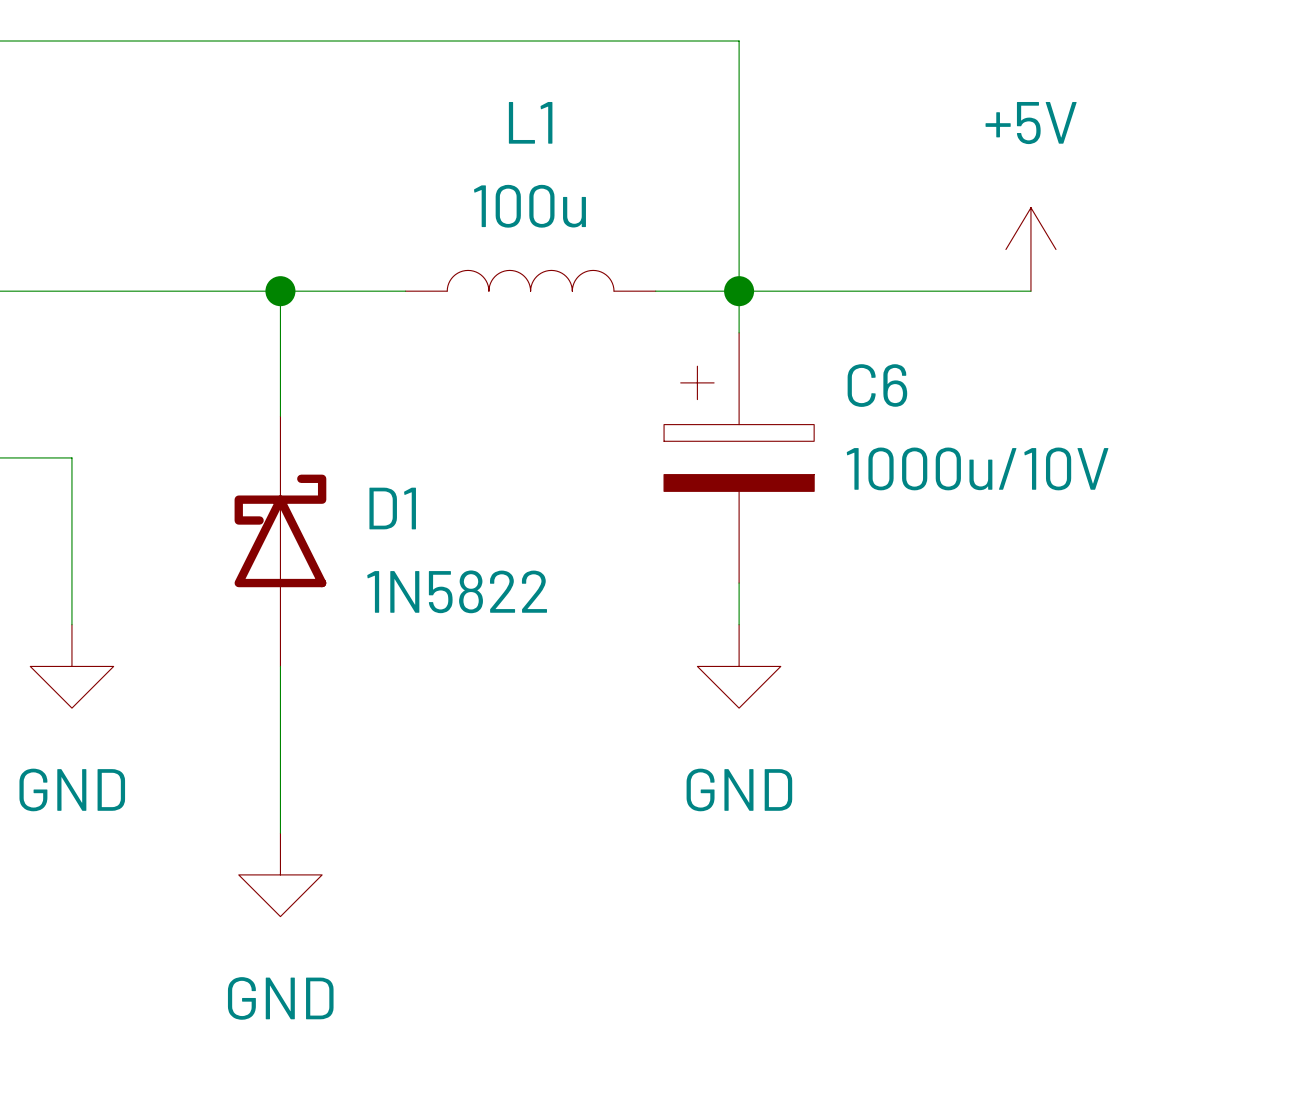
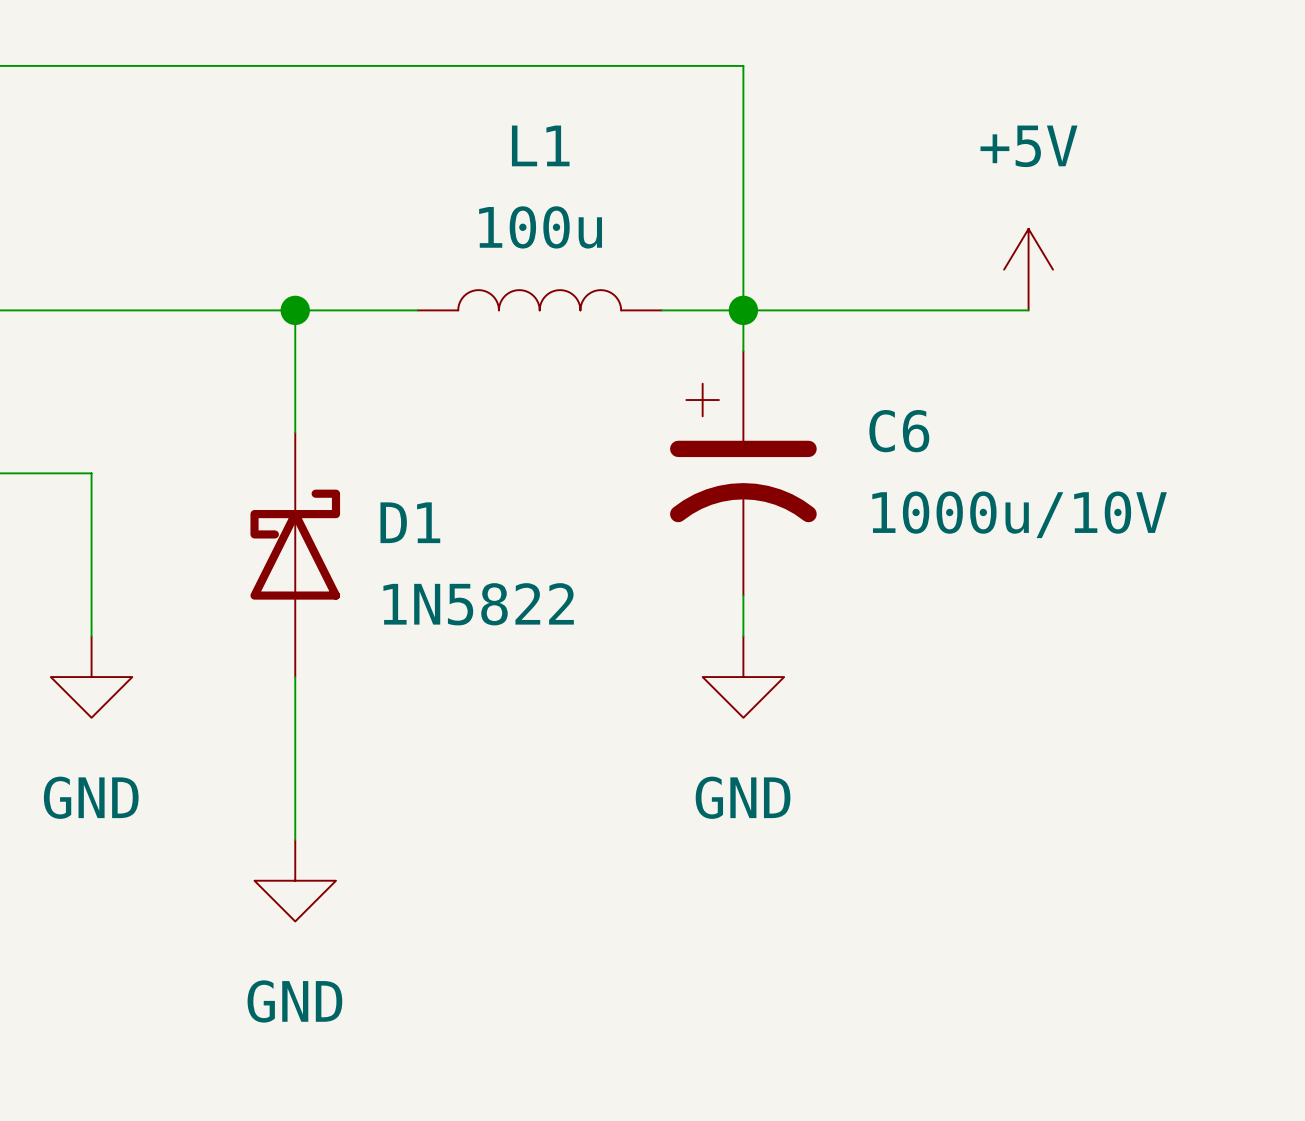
C6 symbol: [664, 332, 815, 584] -> [670, 351, 817, 596]
C6 name position: C6 (877, 385) -> C6 (899, 431)
C6 value position: 1000u/10V (977, 468) -> 1000u/10V (1019, 514)

